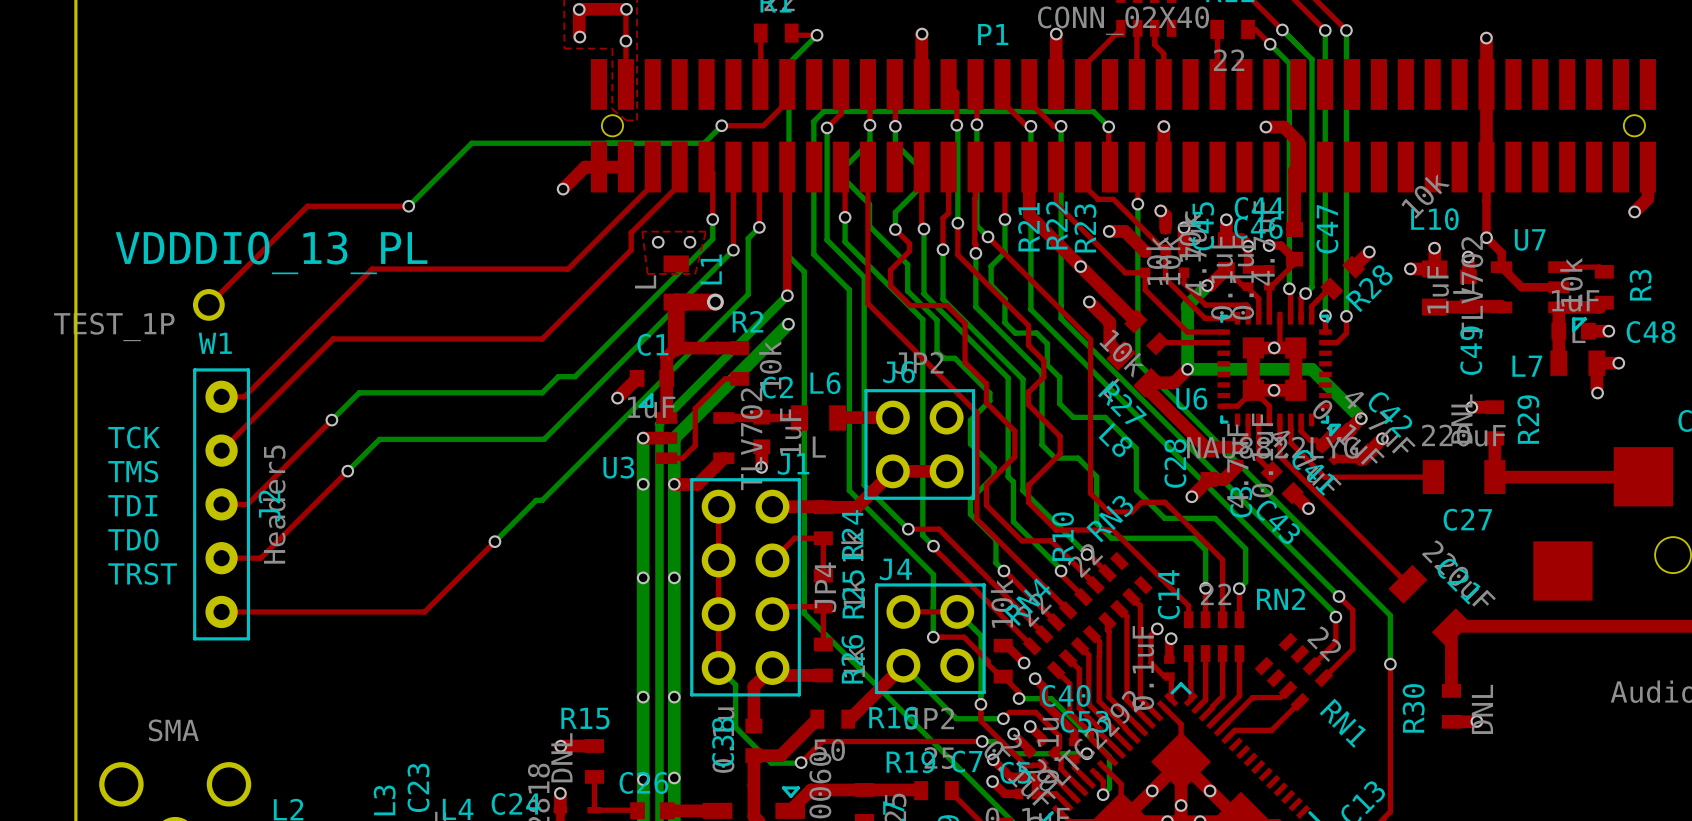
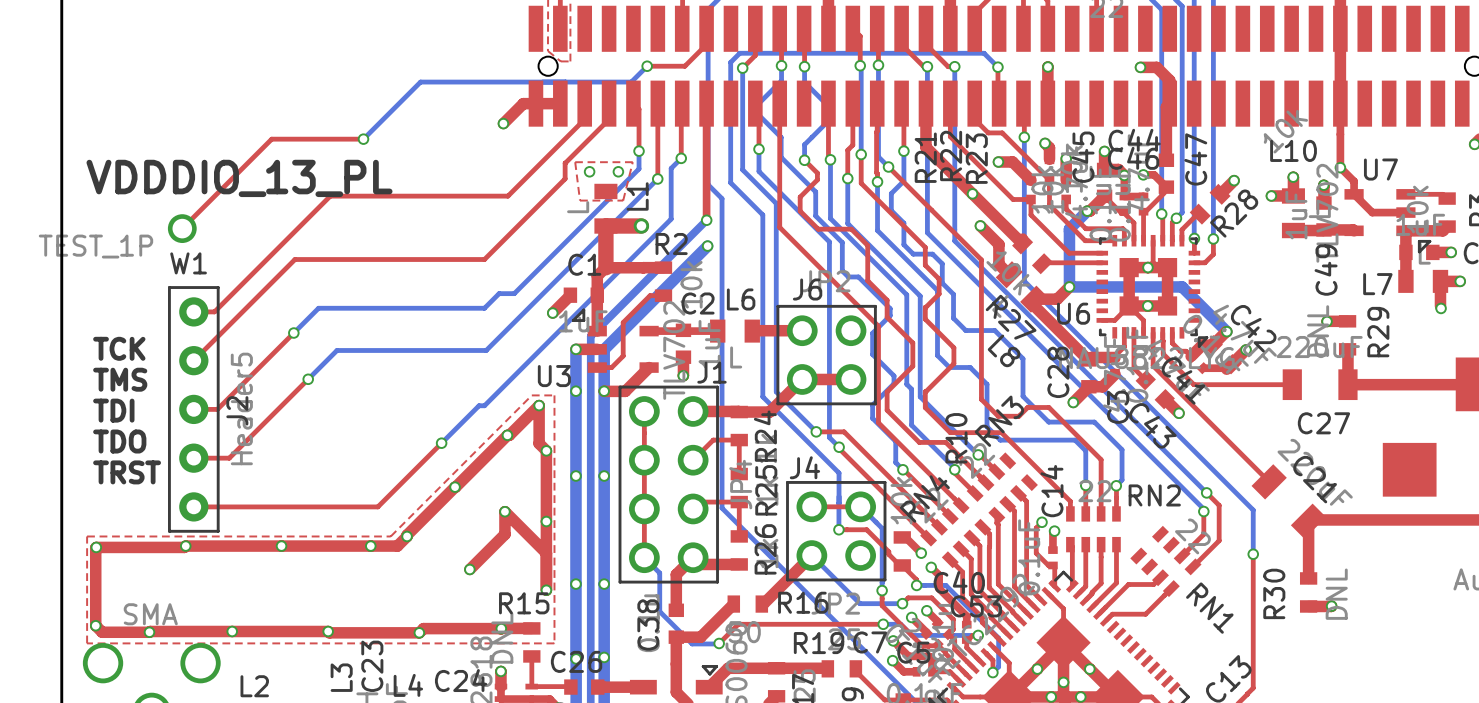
via: none -> (539, 405)
via: none -> (507, 435)
via: none -> (546, 450)
via: none -> (455, 487)
via: none -> (504, 511)
via: none -> (546, 521)
via: none -> (407, 536)
via: none -> (185, 546)
via: none -> (281, 546)
via: none -> (370, 546)
via: none -> (96, 547)
top track: none -> (546, 553) (504, 511) (504, 534) (469, 569)
via: none -> (469, 569)
top track: none -> (546, 590) (546, 450) (539, 443) (539, 405) (397, 546) (95, 547) (95, 625) (102, 632) (419, 632) (423, 628) (501, 628)
via: none -> (546, 590)
via: none -> (95, 625)
via: none -> (232, 631)
via: none -> (328, 631)
via: none -> (149, 632)
via: none -> (419, 632)
top zone outline: none -> (554, 643) (554, 395) (531, 395) (390, 536) (87, 536) (87, 643) (554, 643)

